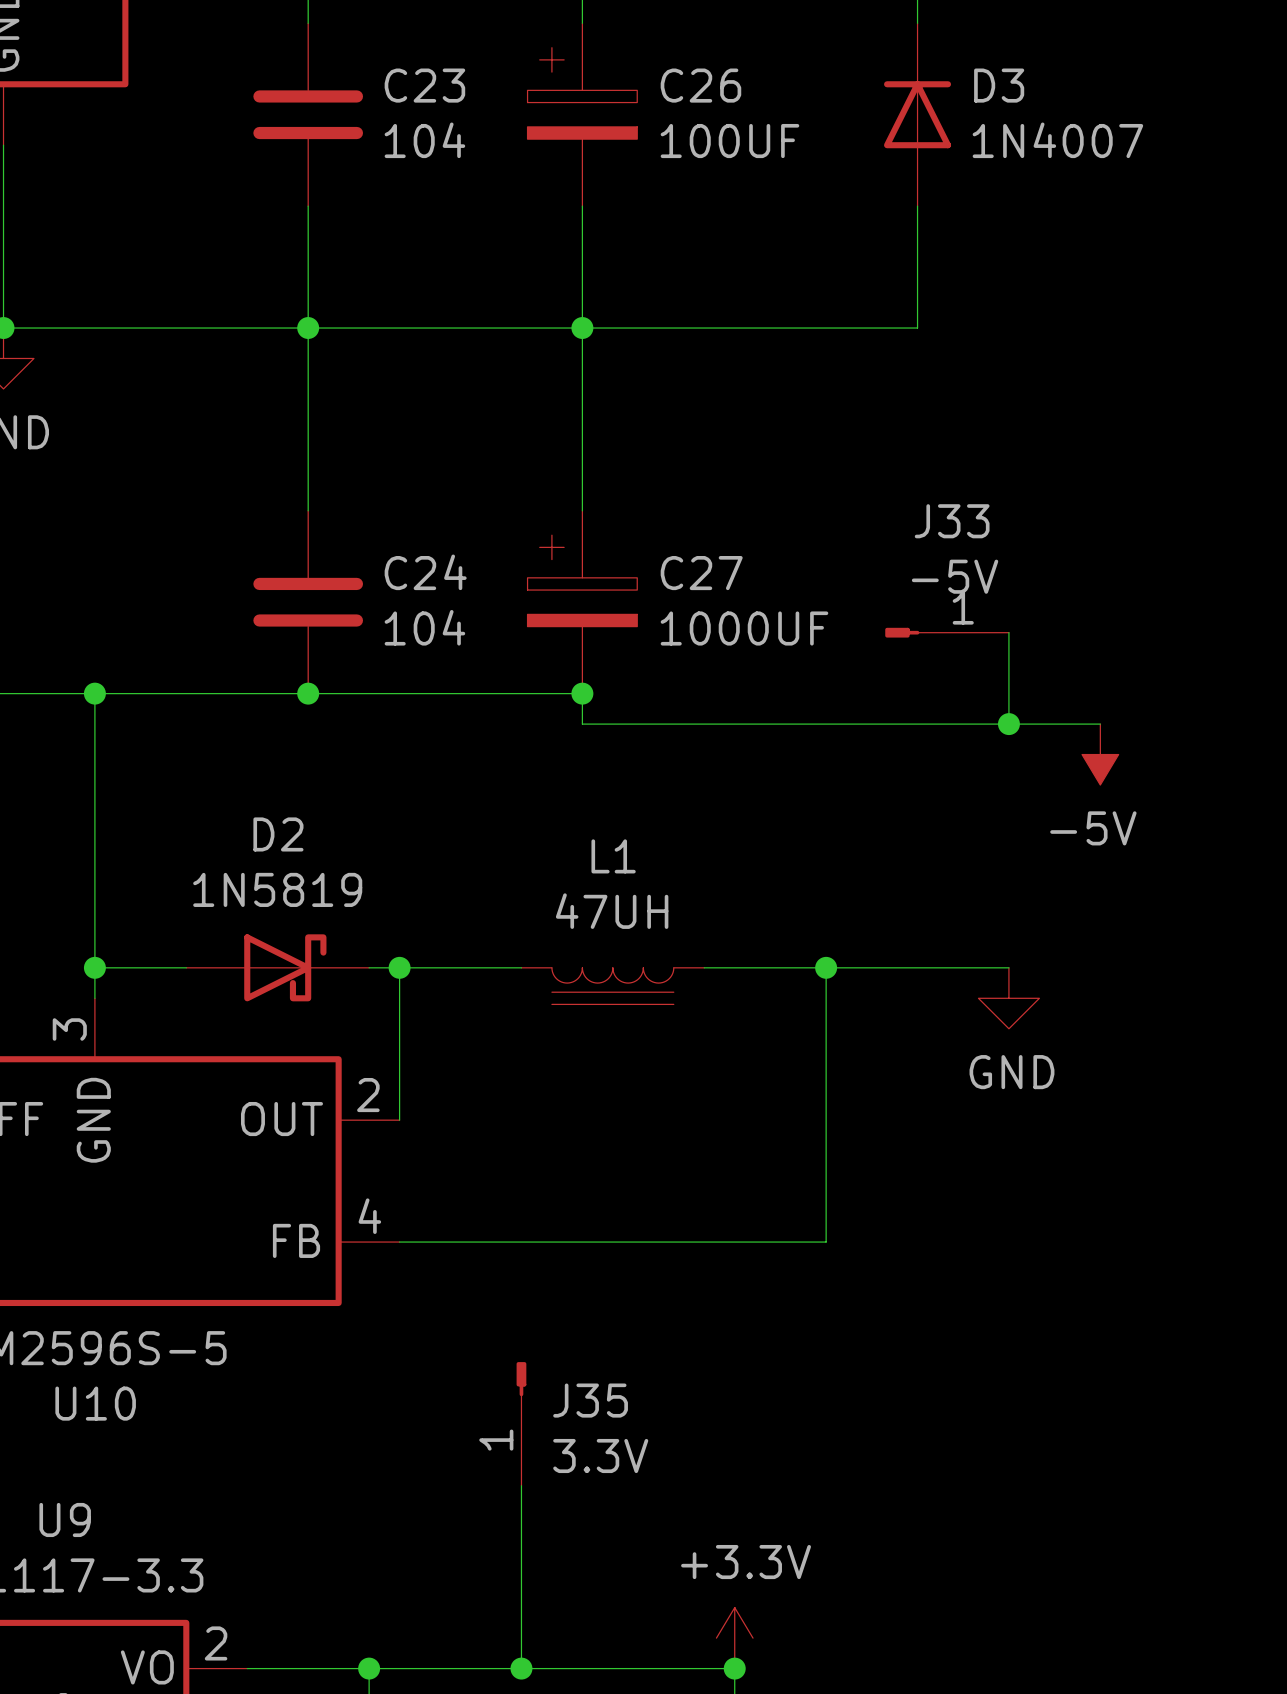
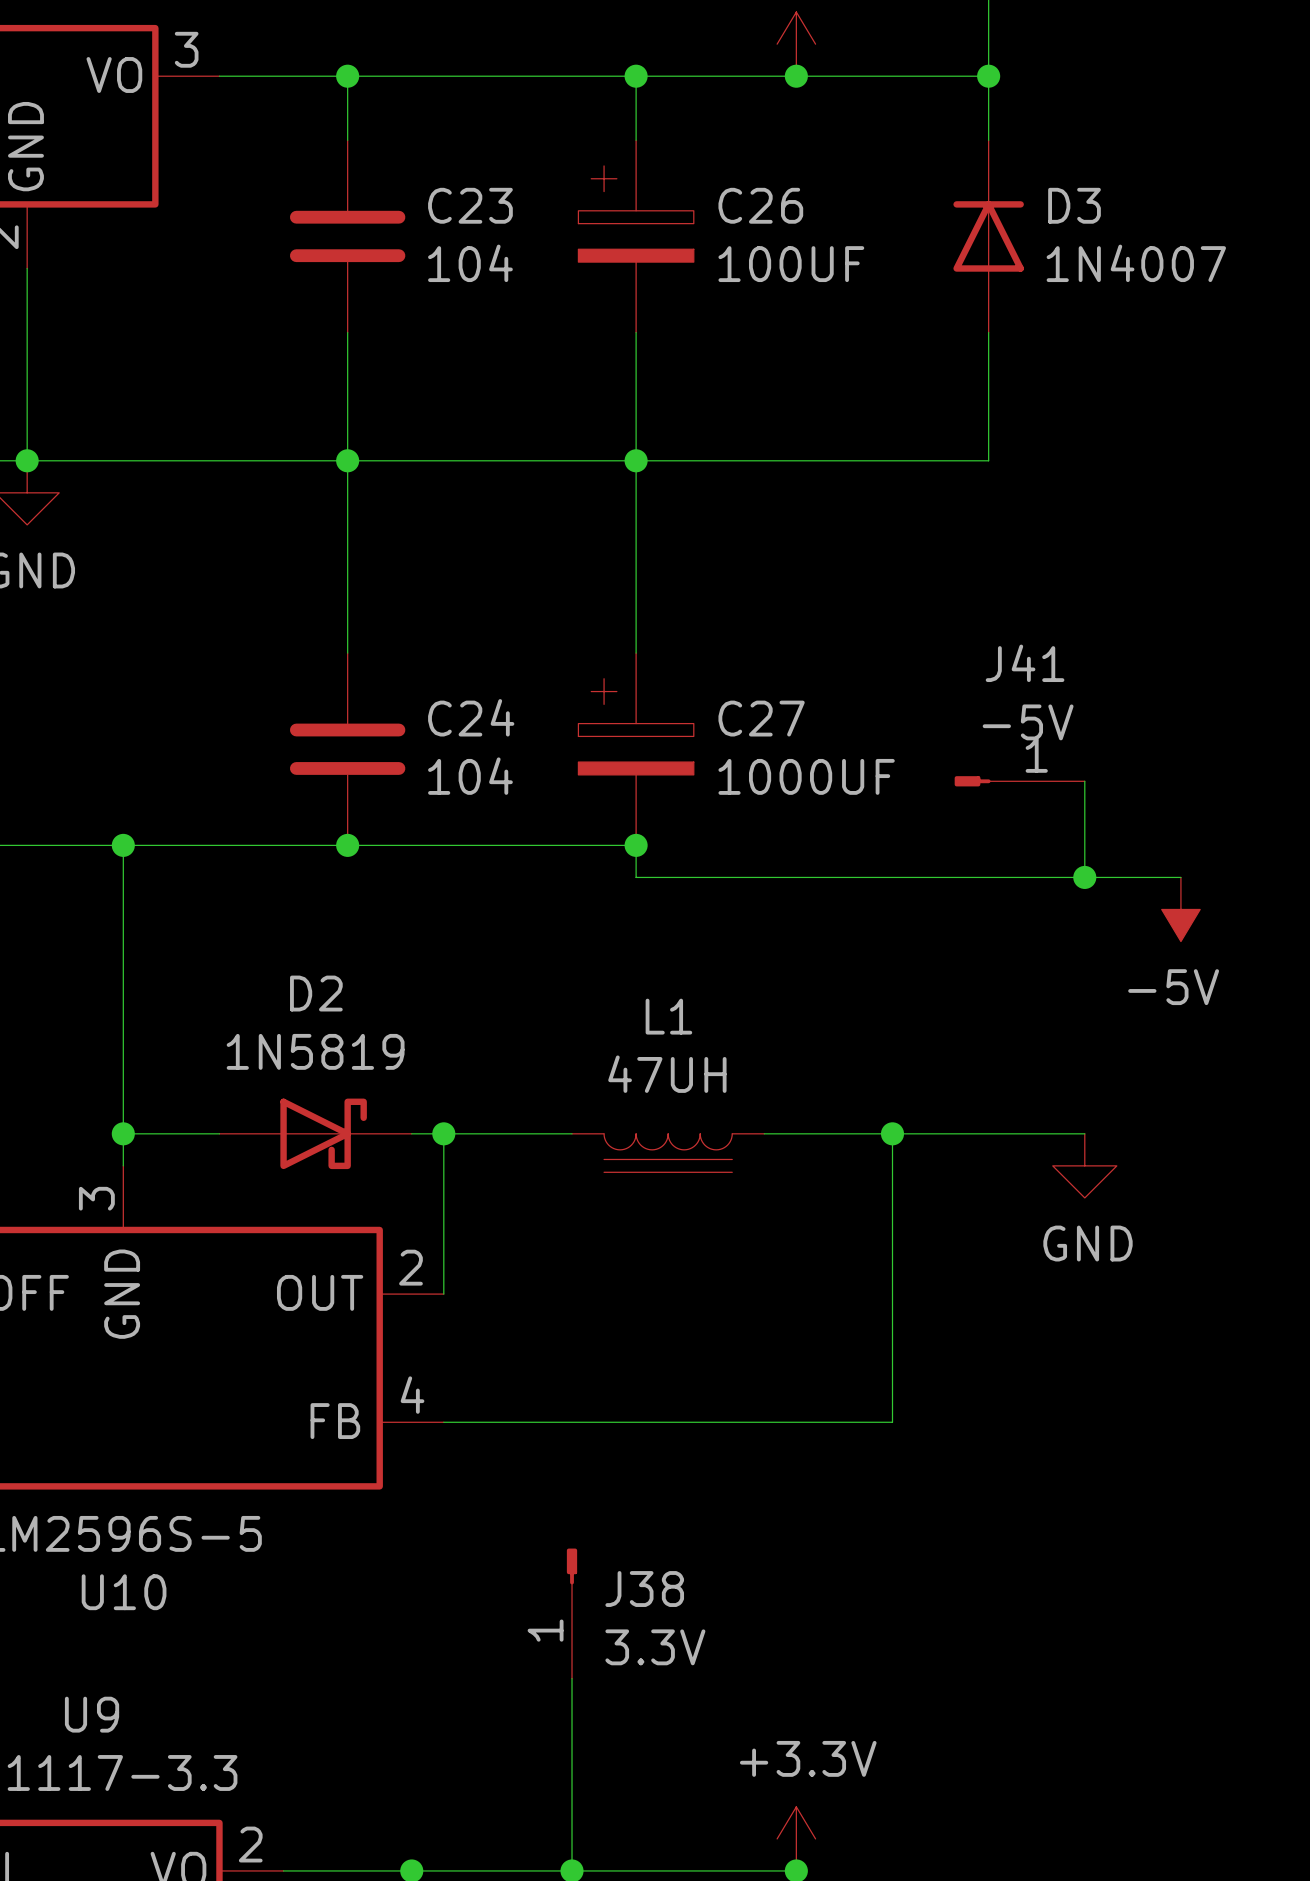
J33 name: J33 (952, 521) -> J41 (1025, 663)
J35 name: J35 (590, 1400) -> J38 (644, 1589)

